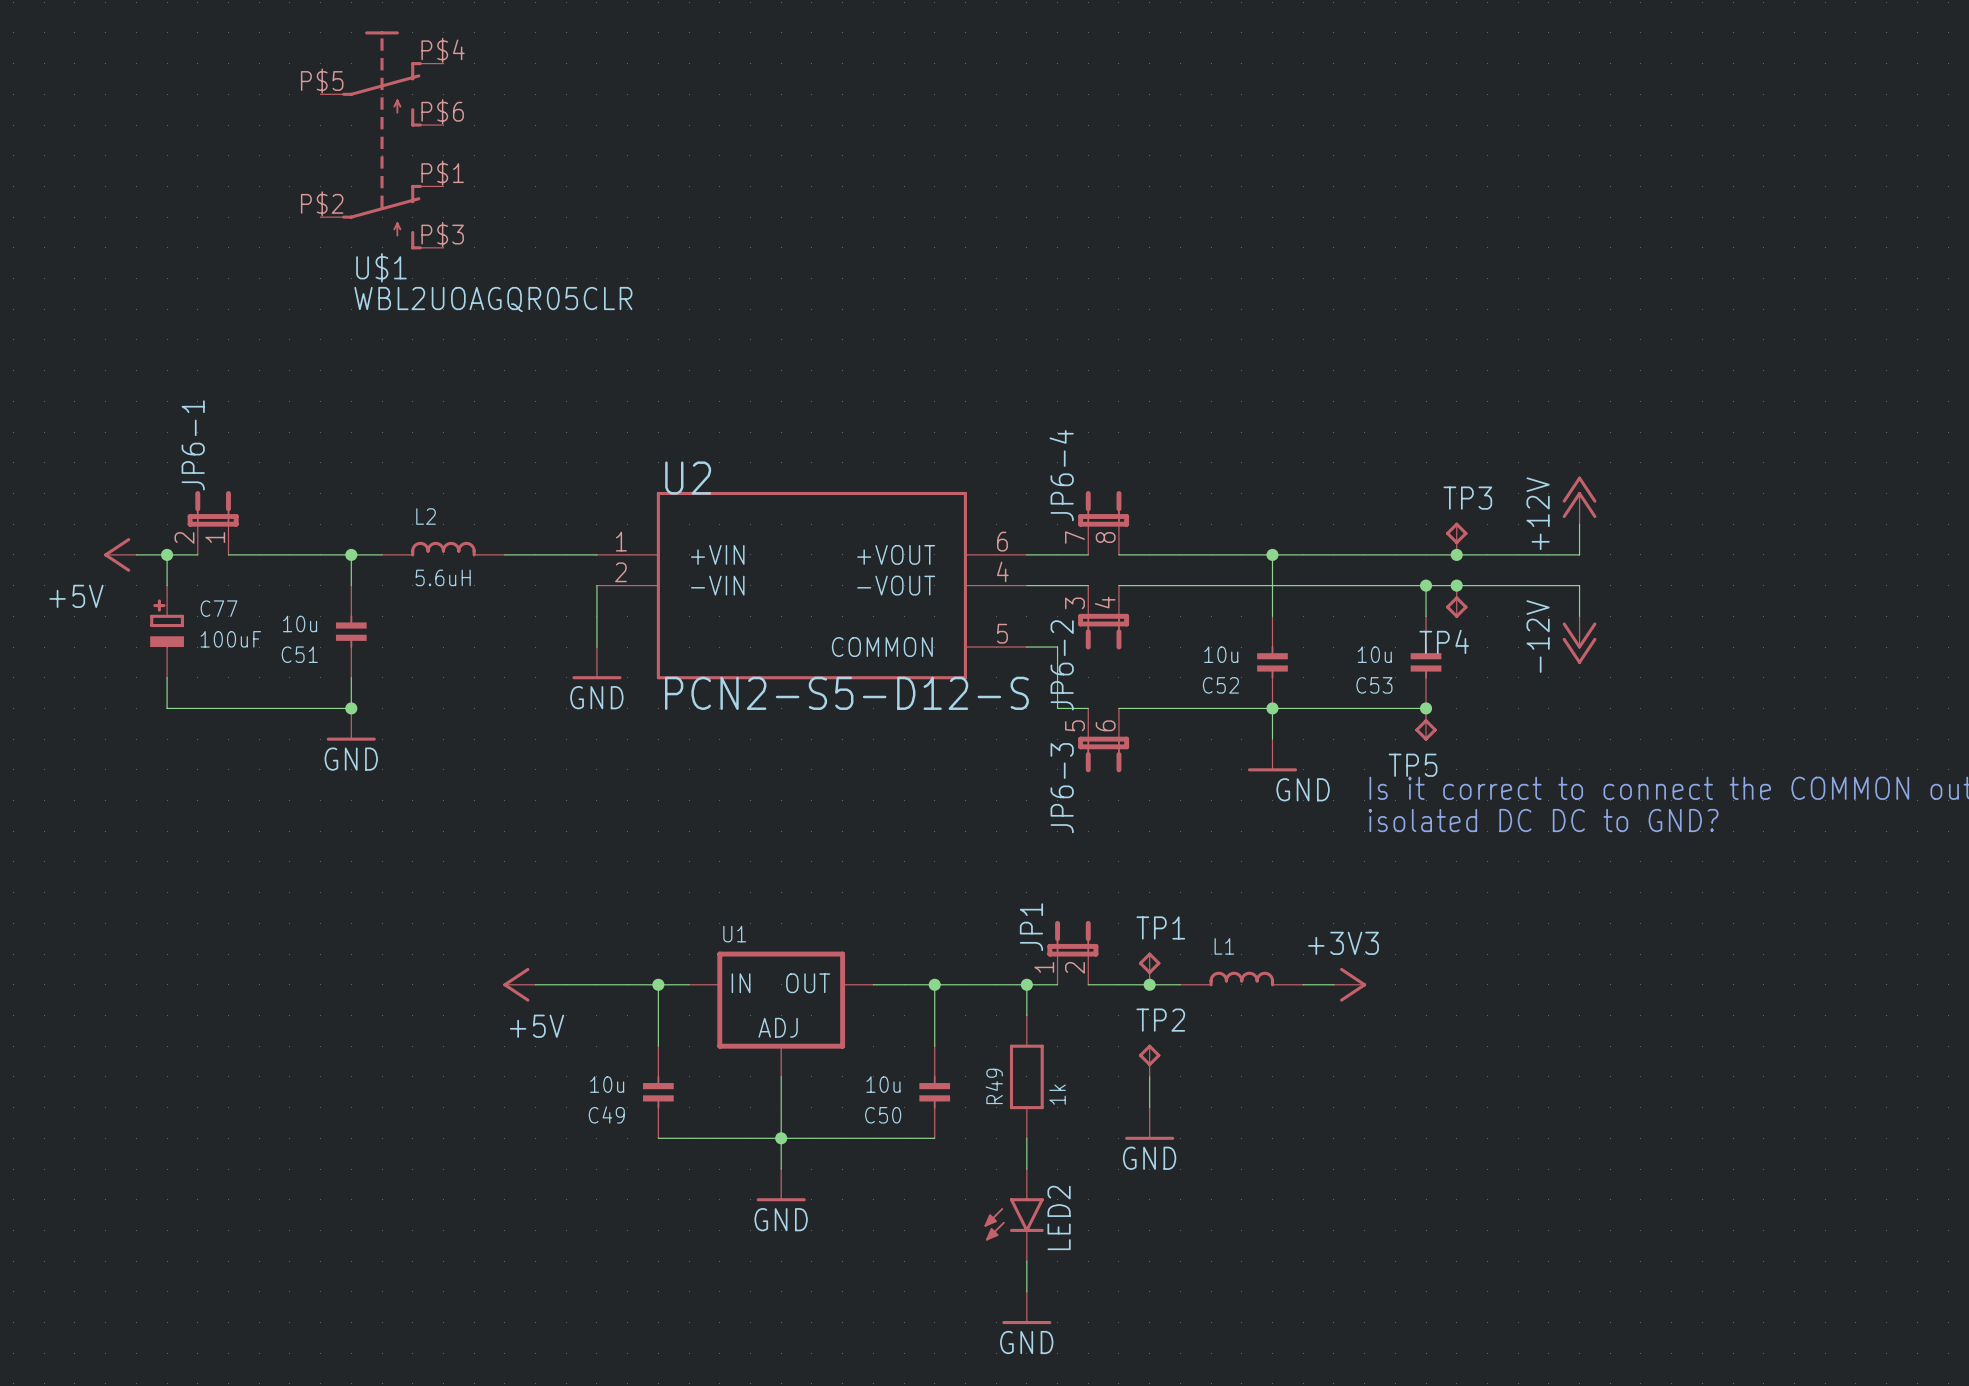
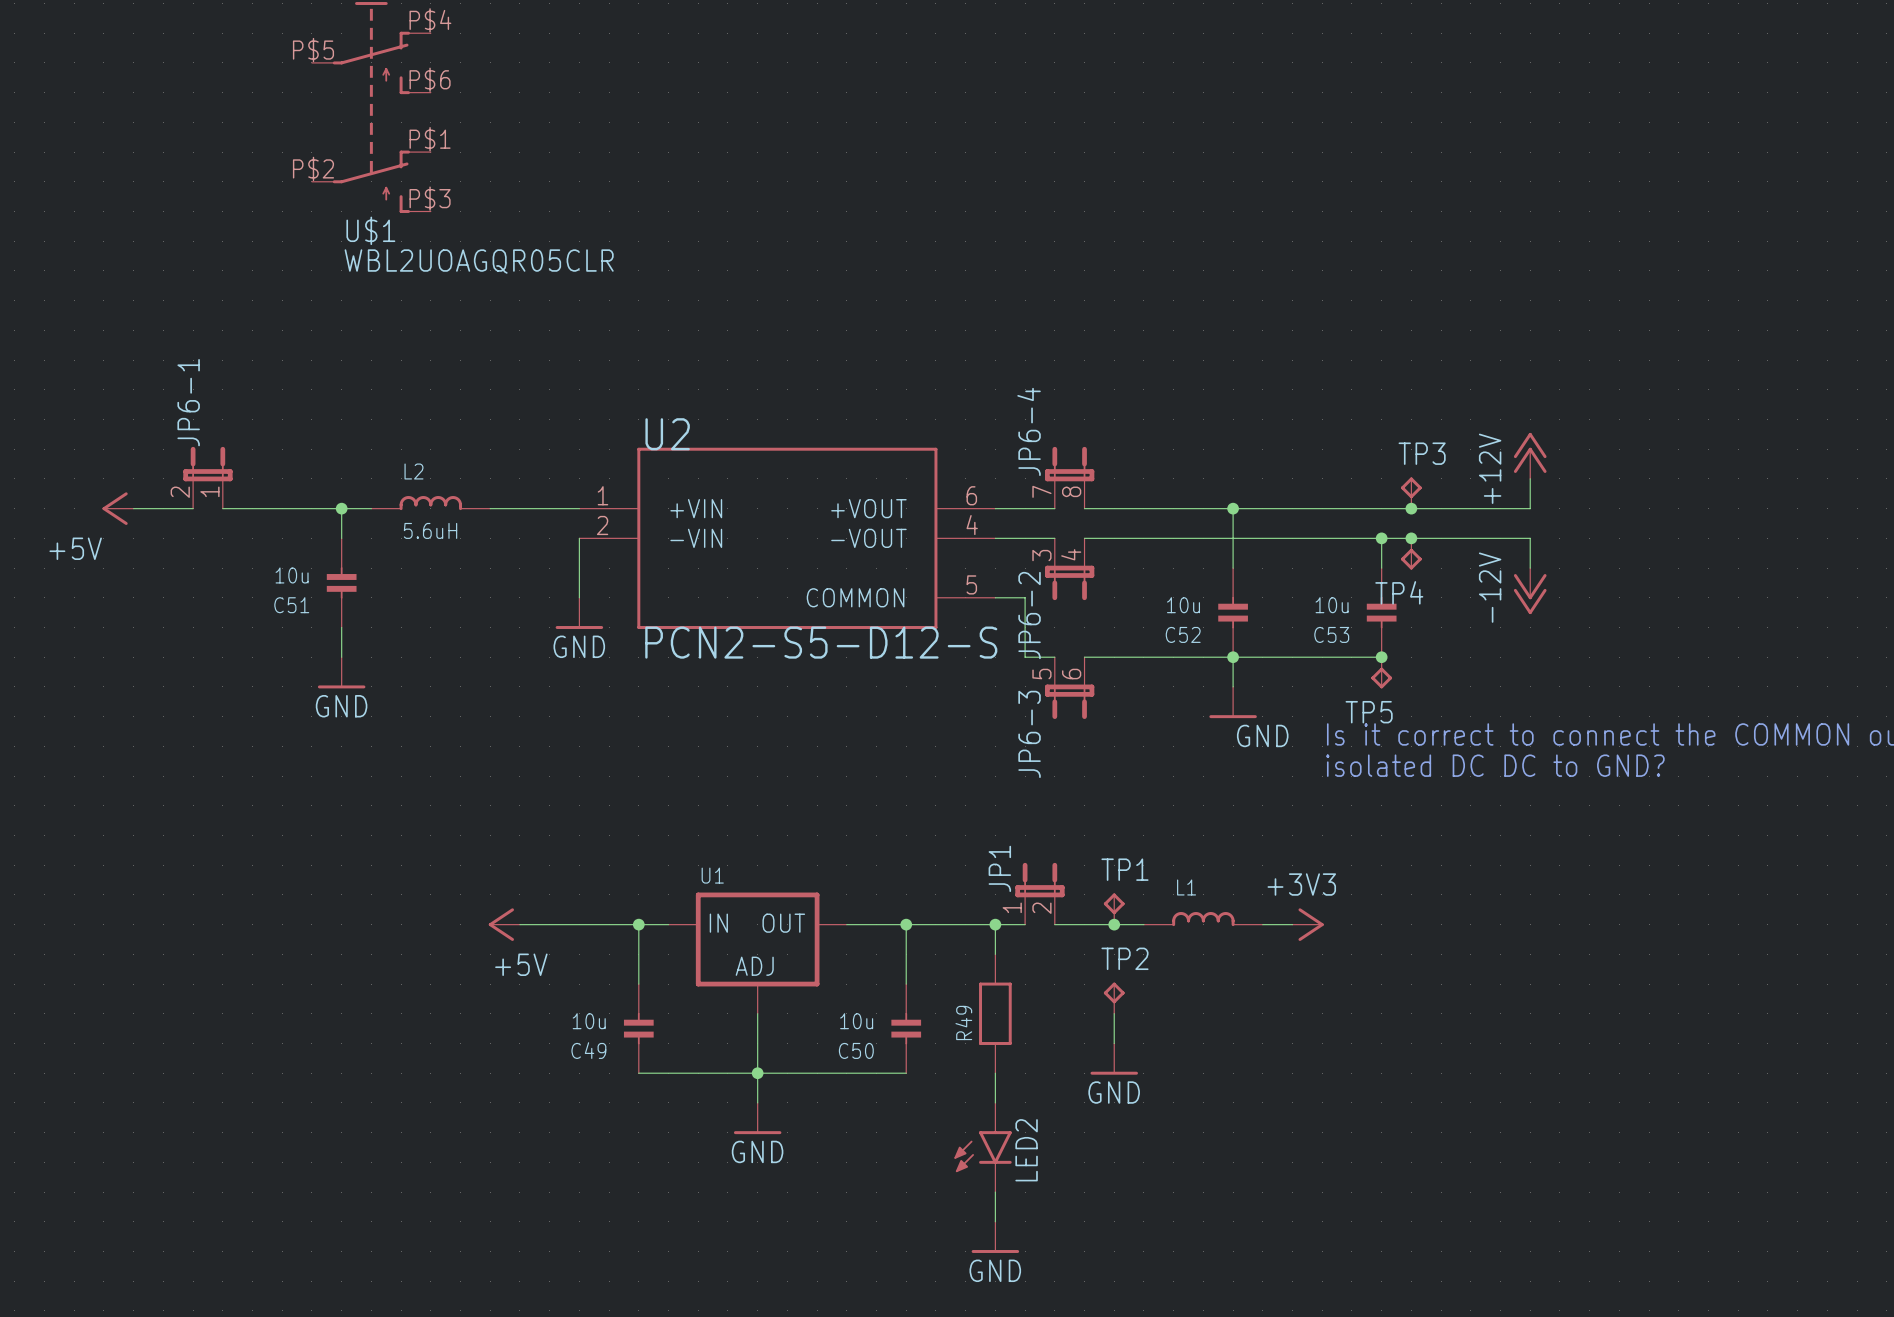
wire: (167, 554) (167, 585) -> none
junction: (167, 554) -> none
C77: 100uF (167, 631) -> none
wire: (167, 677) (167, 708) (351, 708) -> none
junction: (351, 708) -> none
R49 value: 1k (1057, 1094) -> none

